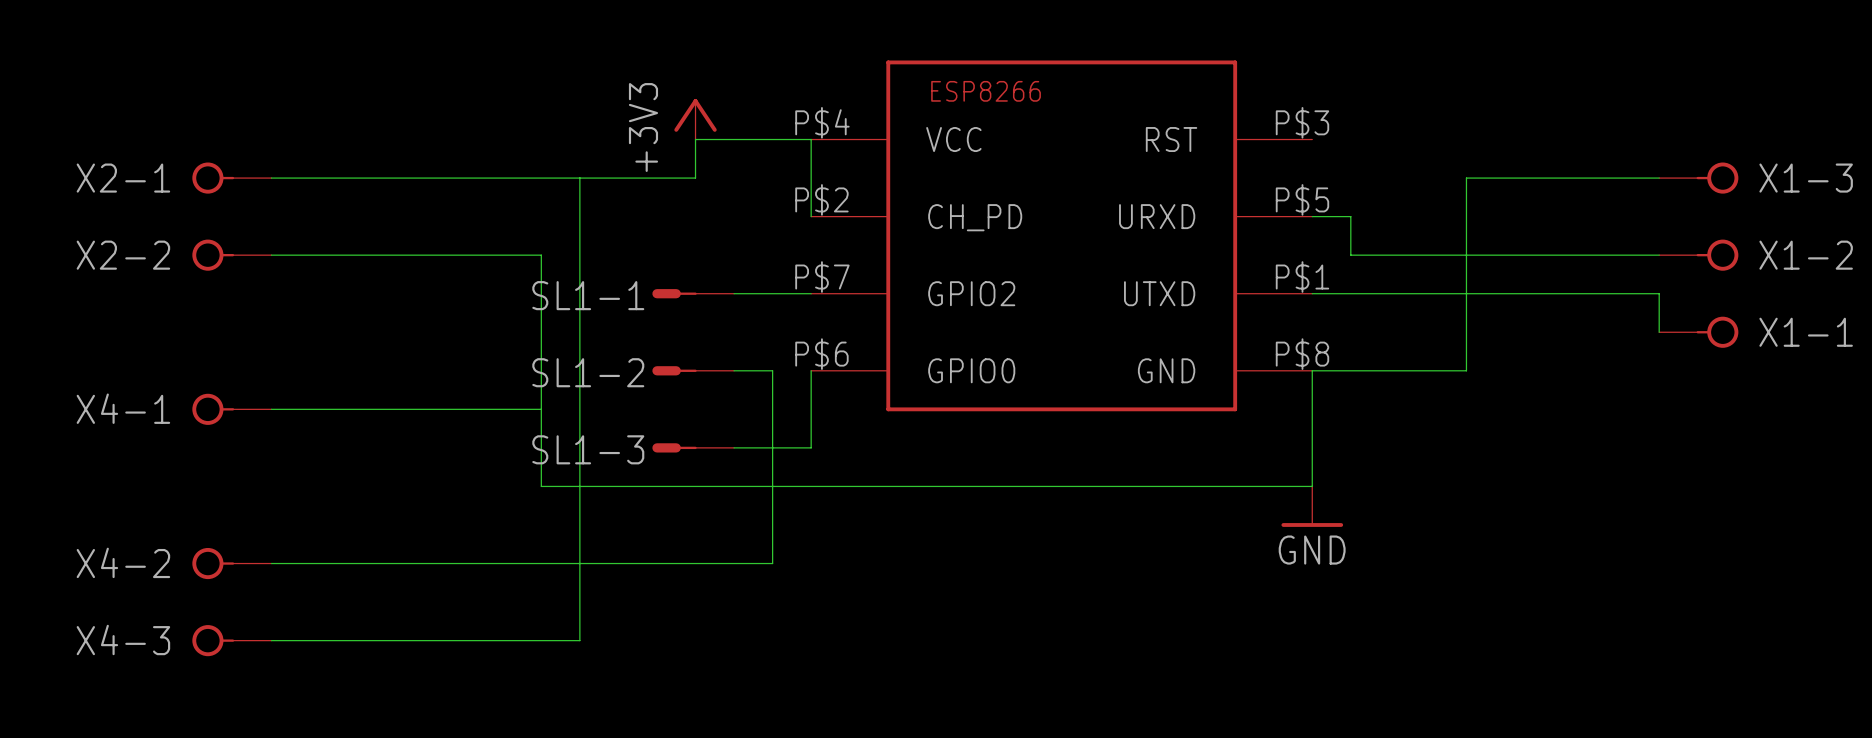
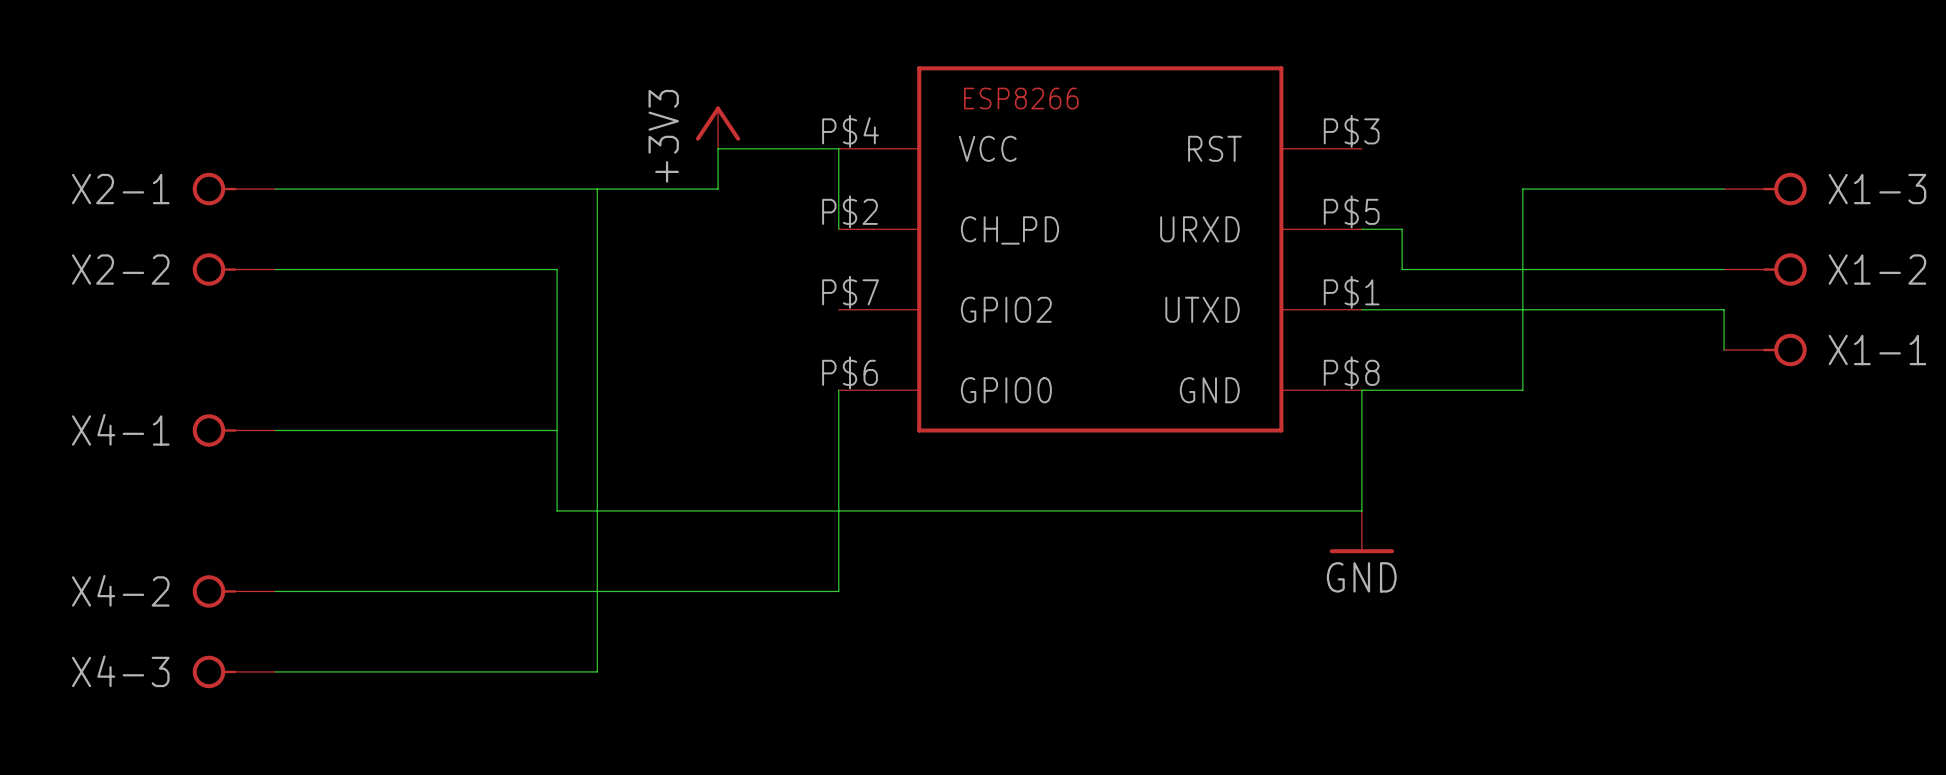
SL1-1: (693, 293) -> none
wire: (734, 293) (811, 293) -> none
SL1-2: (693, 370) -> none
wire: (734, 370) (772, 370) (772, 563) -> (838, 470) (838, 591) (798, 591)
SL1-3: (693, 447) -> none
wire: (734, 447) (811, 447) -> none

